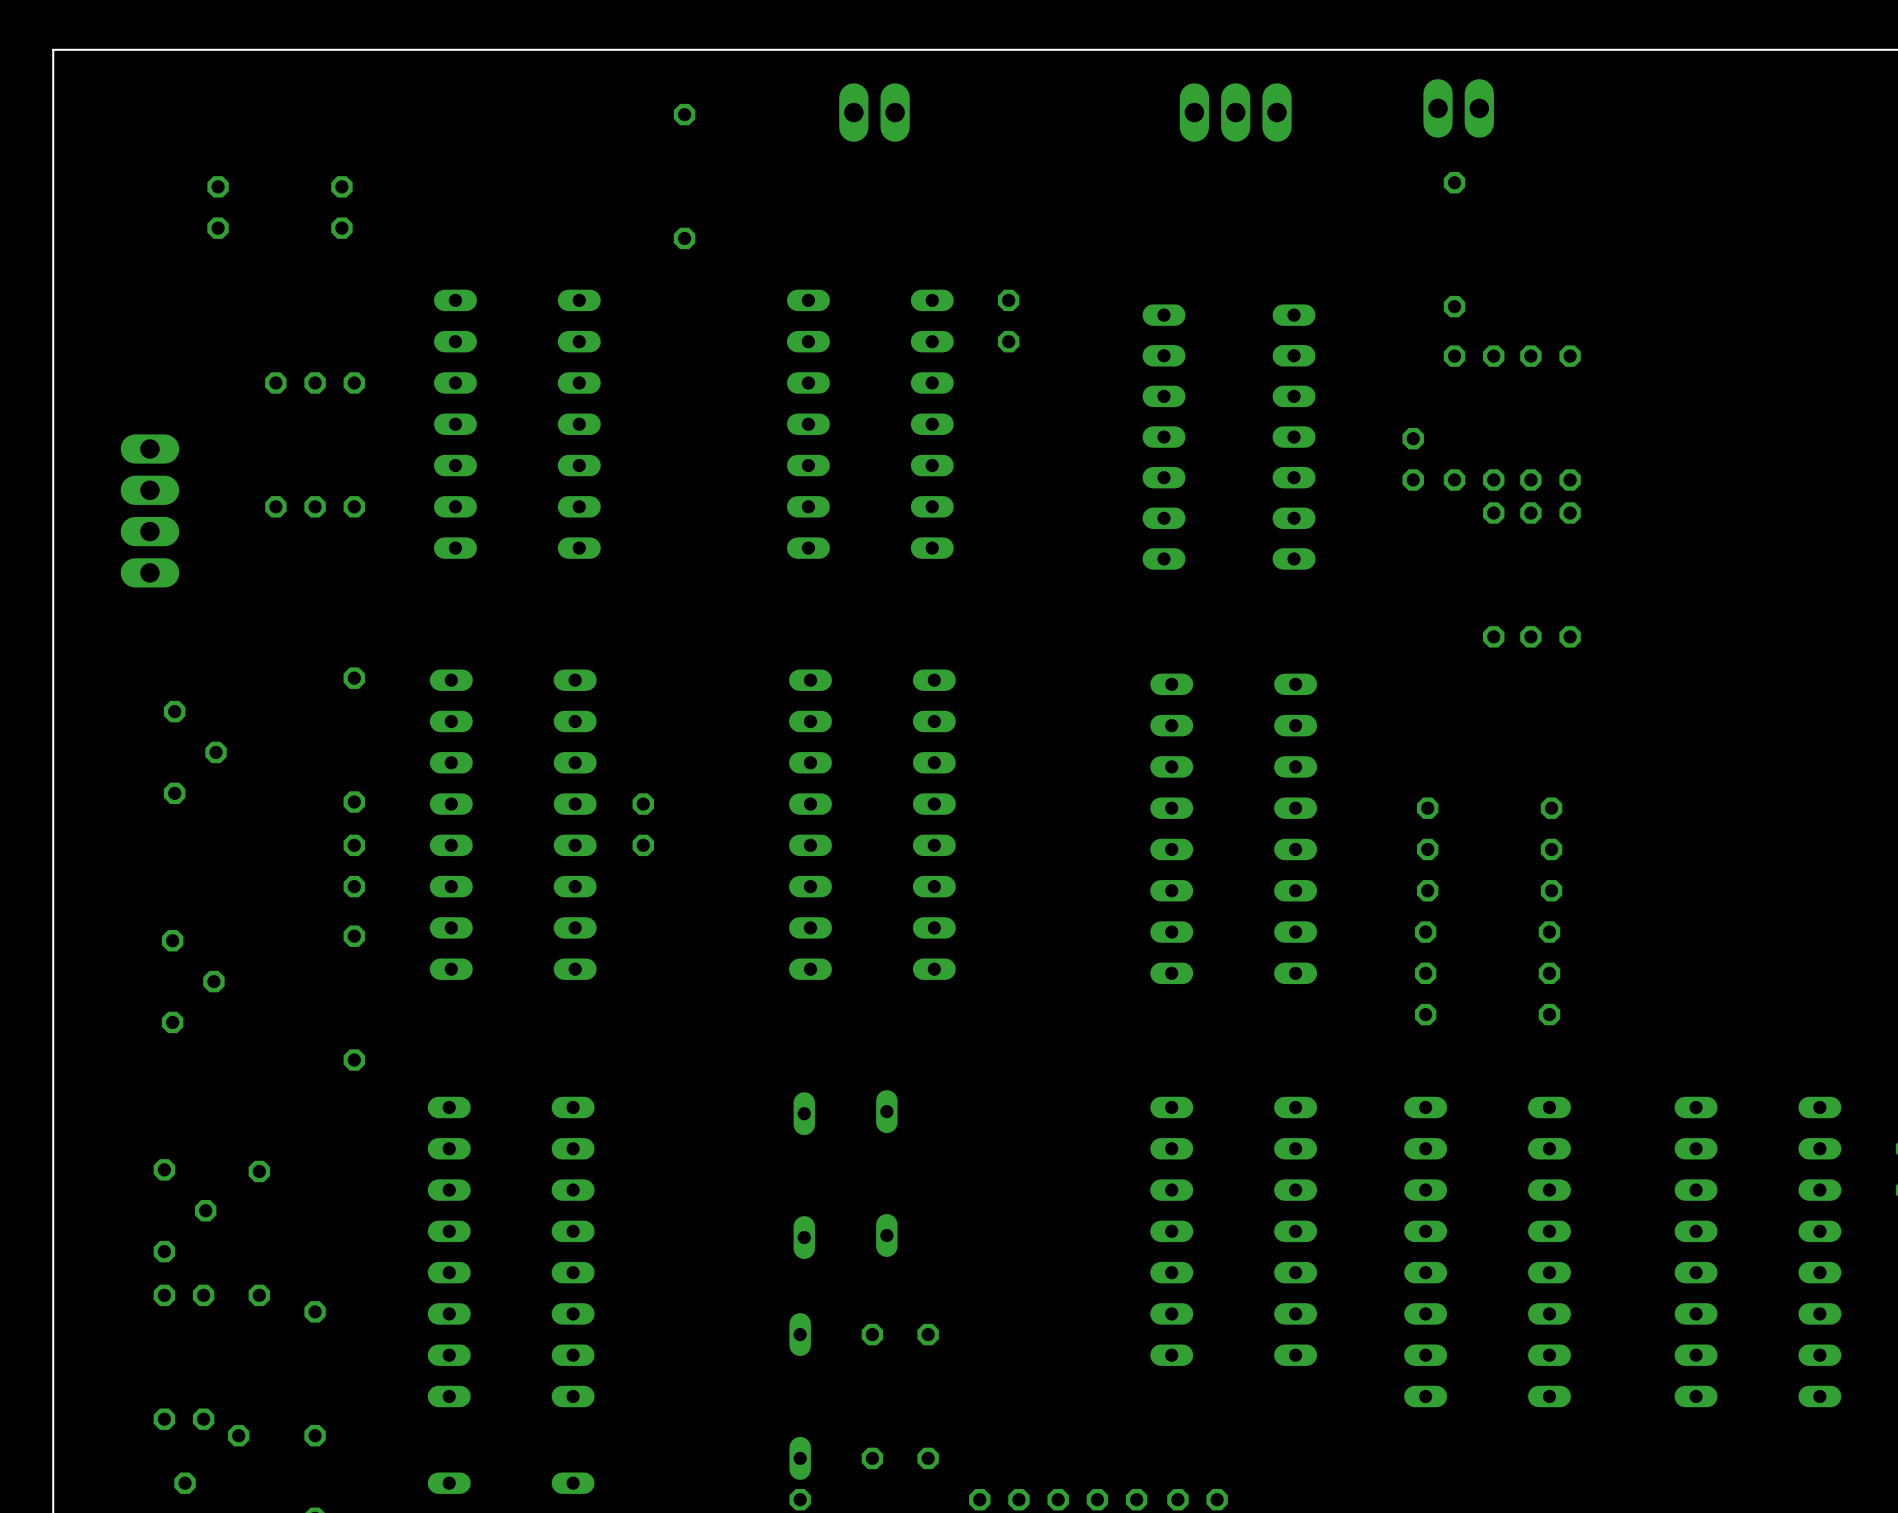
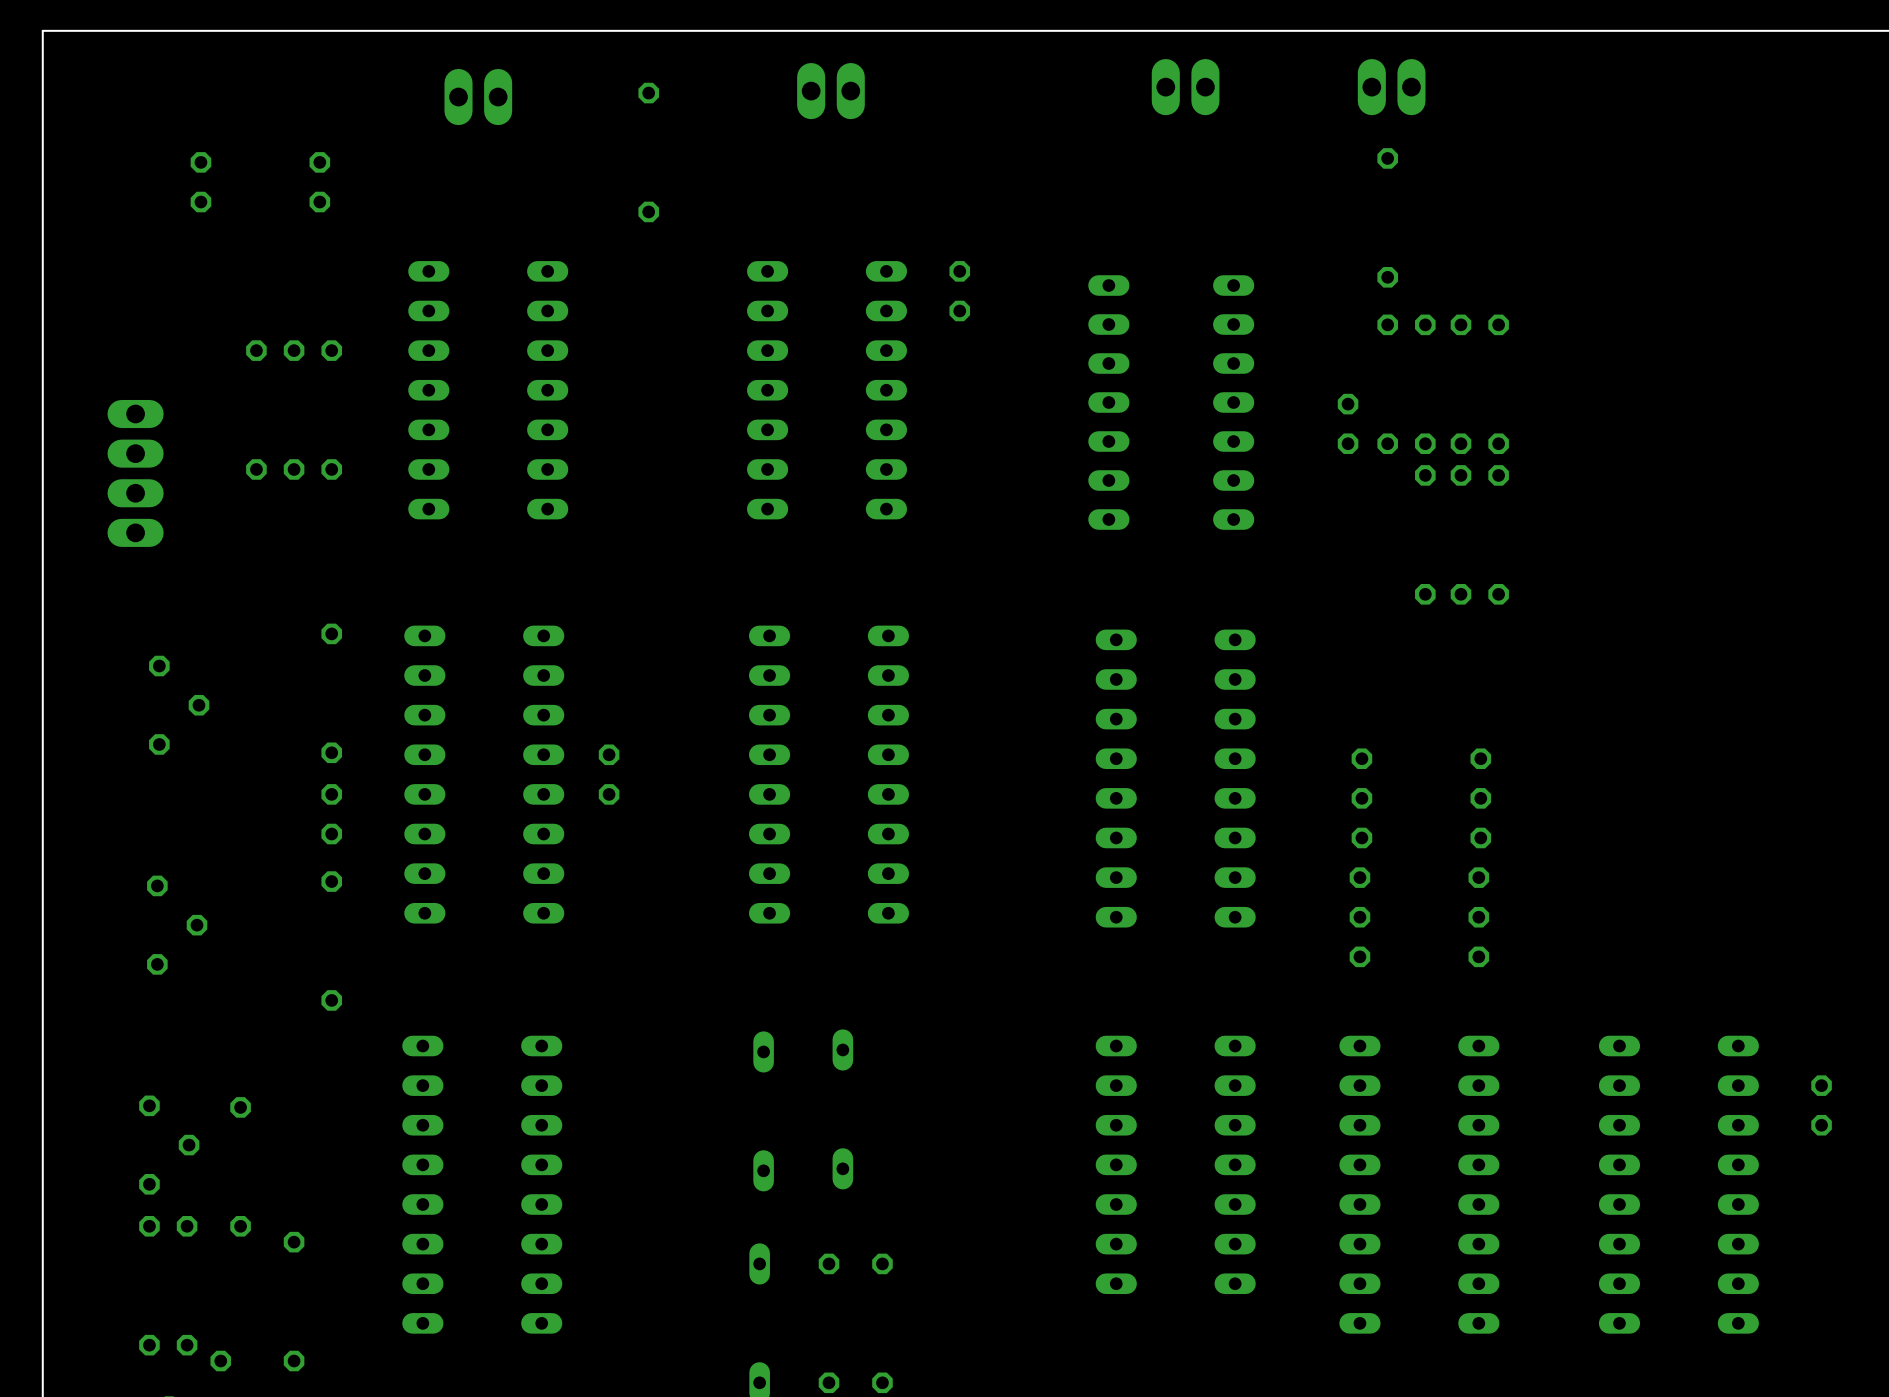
part footprint: [1179, 83, 1292, 142] -> [1151, 59, 1220, 116]
part: none -> (478, 97)

